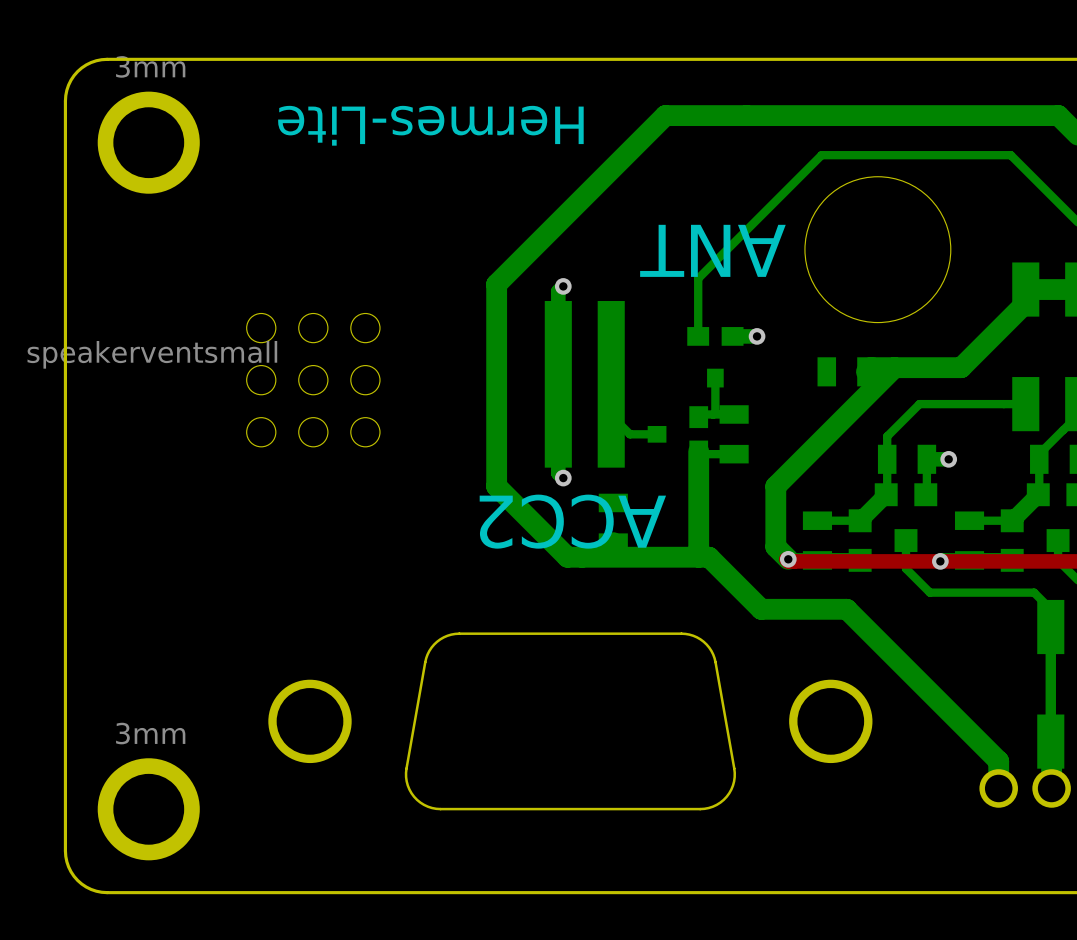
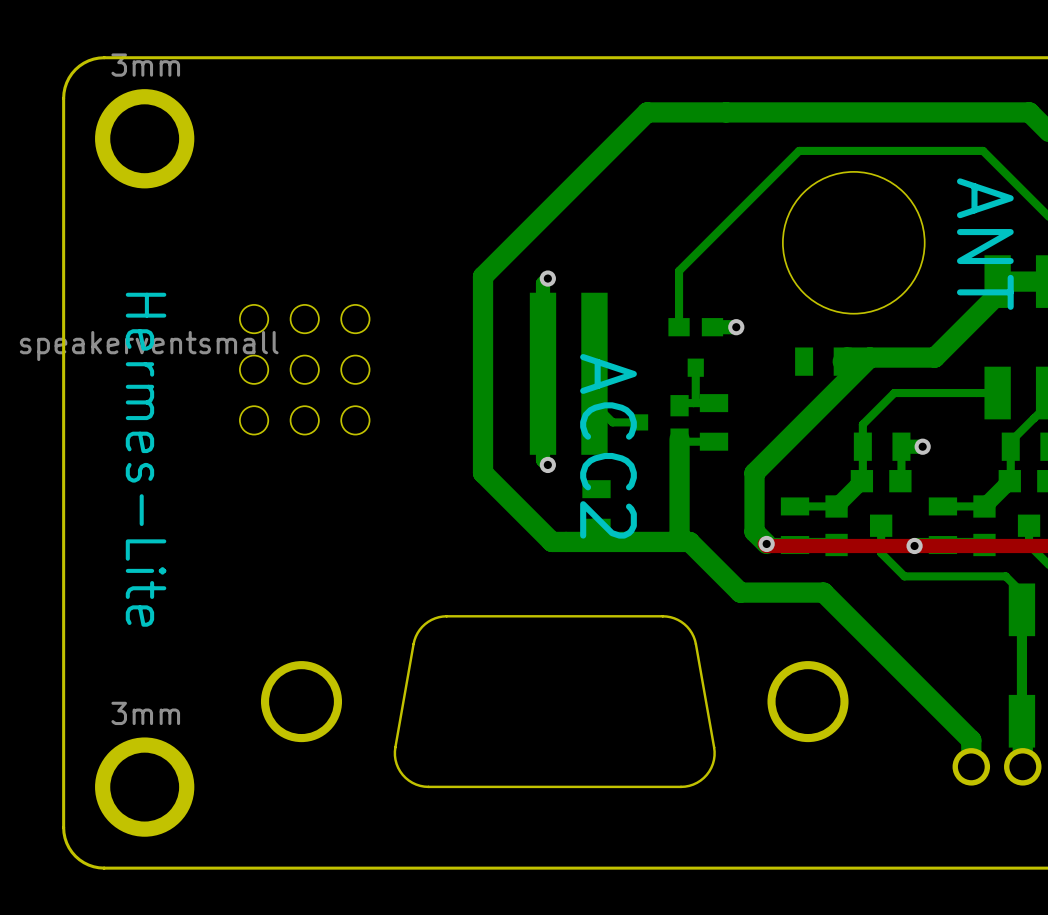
text rotation: 0° (430, 125) -> 90° counterclockwise (146, 459)
text position: Hermes-Lite (430, 125) -> Hermes-Lite (146, 459)
text rotation: 0° (712, 250) -> 90° counterclockwise (985, 244)
text position: ANT (712, 250) -> ANT (985, 244)
text rotation: 0° (572, 521) -> 90° counterclockwise (608, 446)

